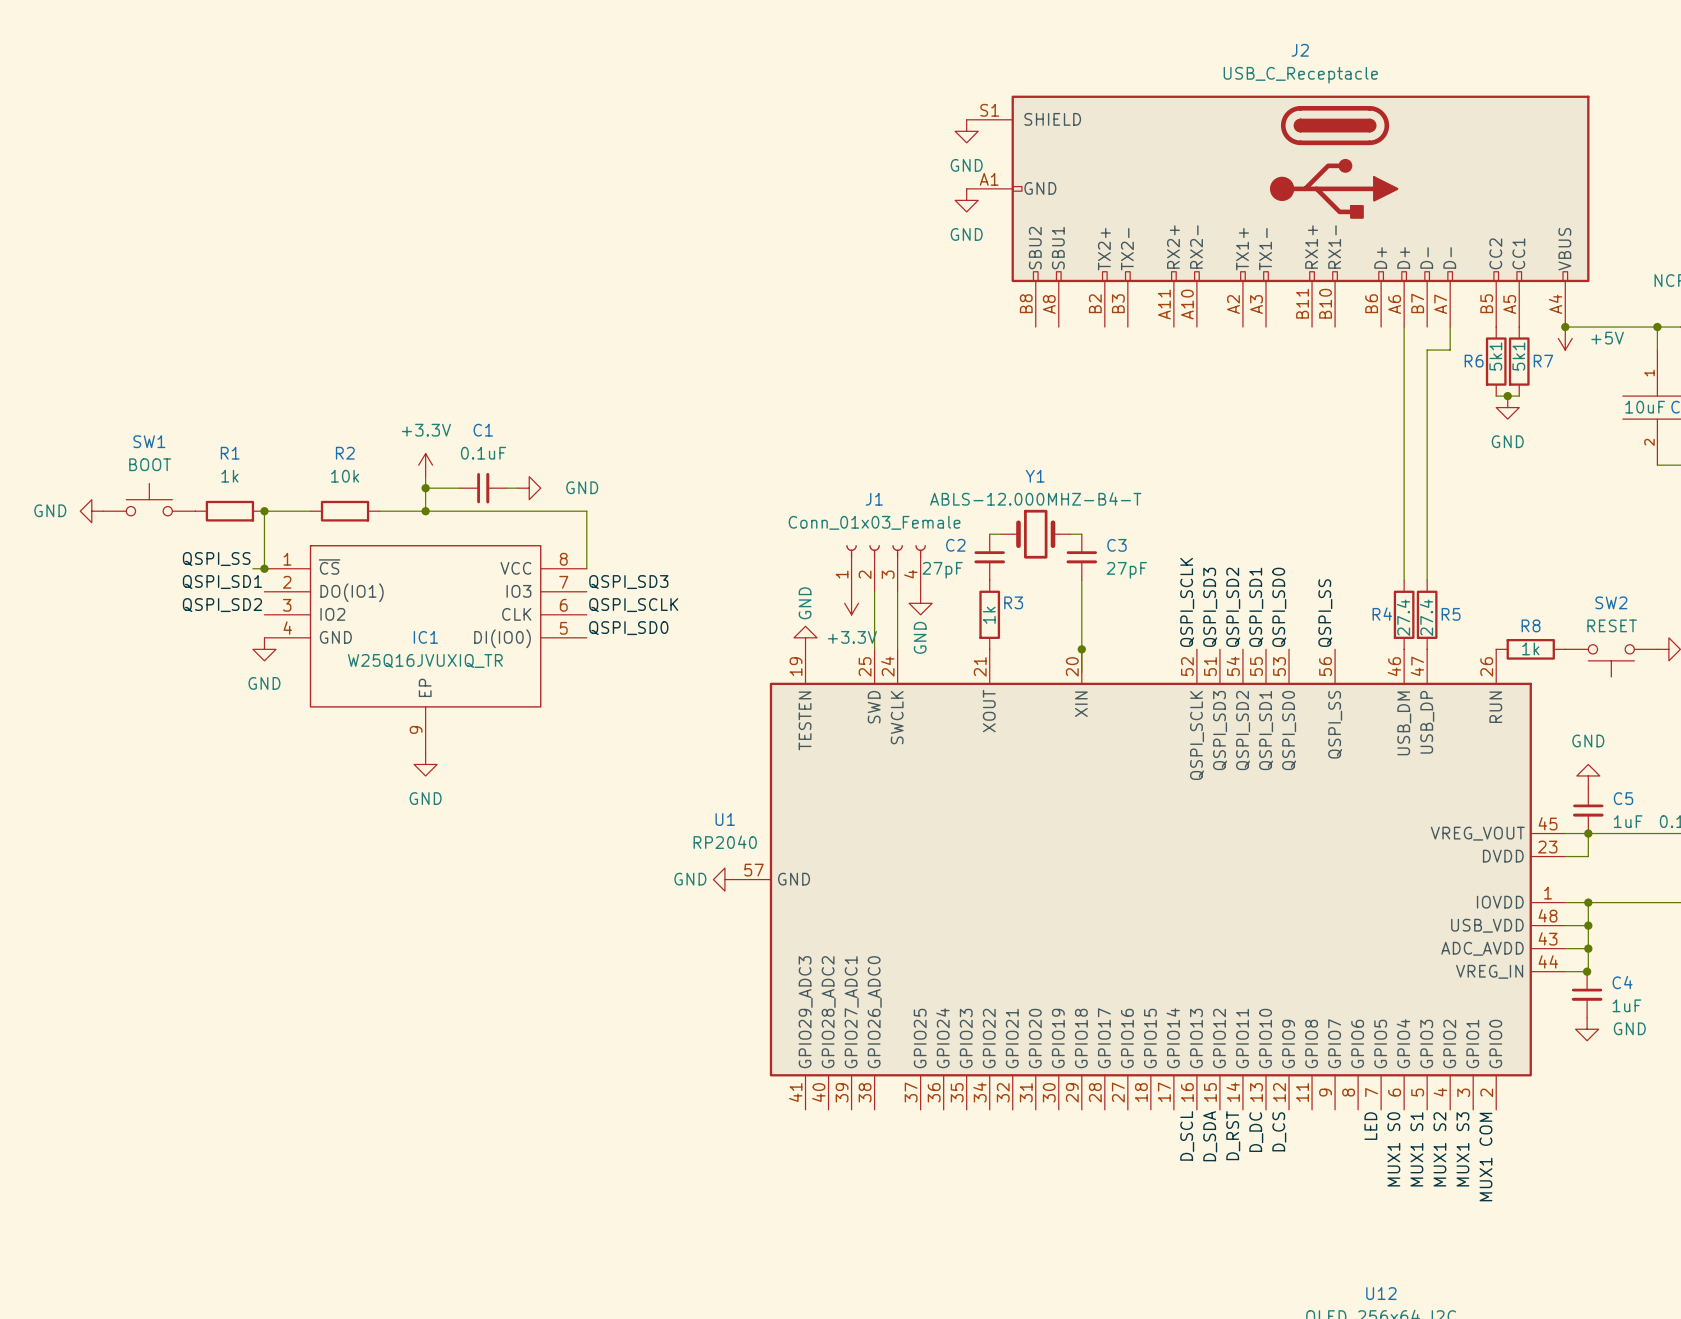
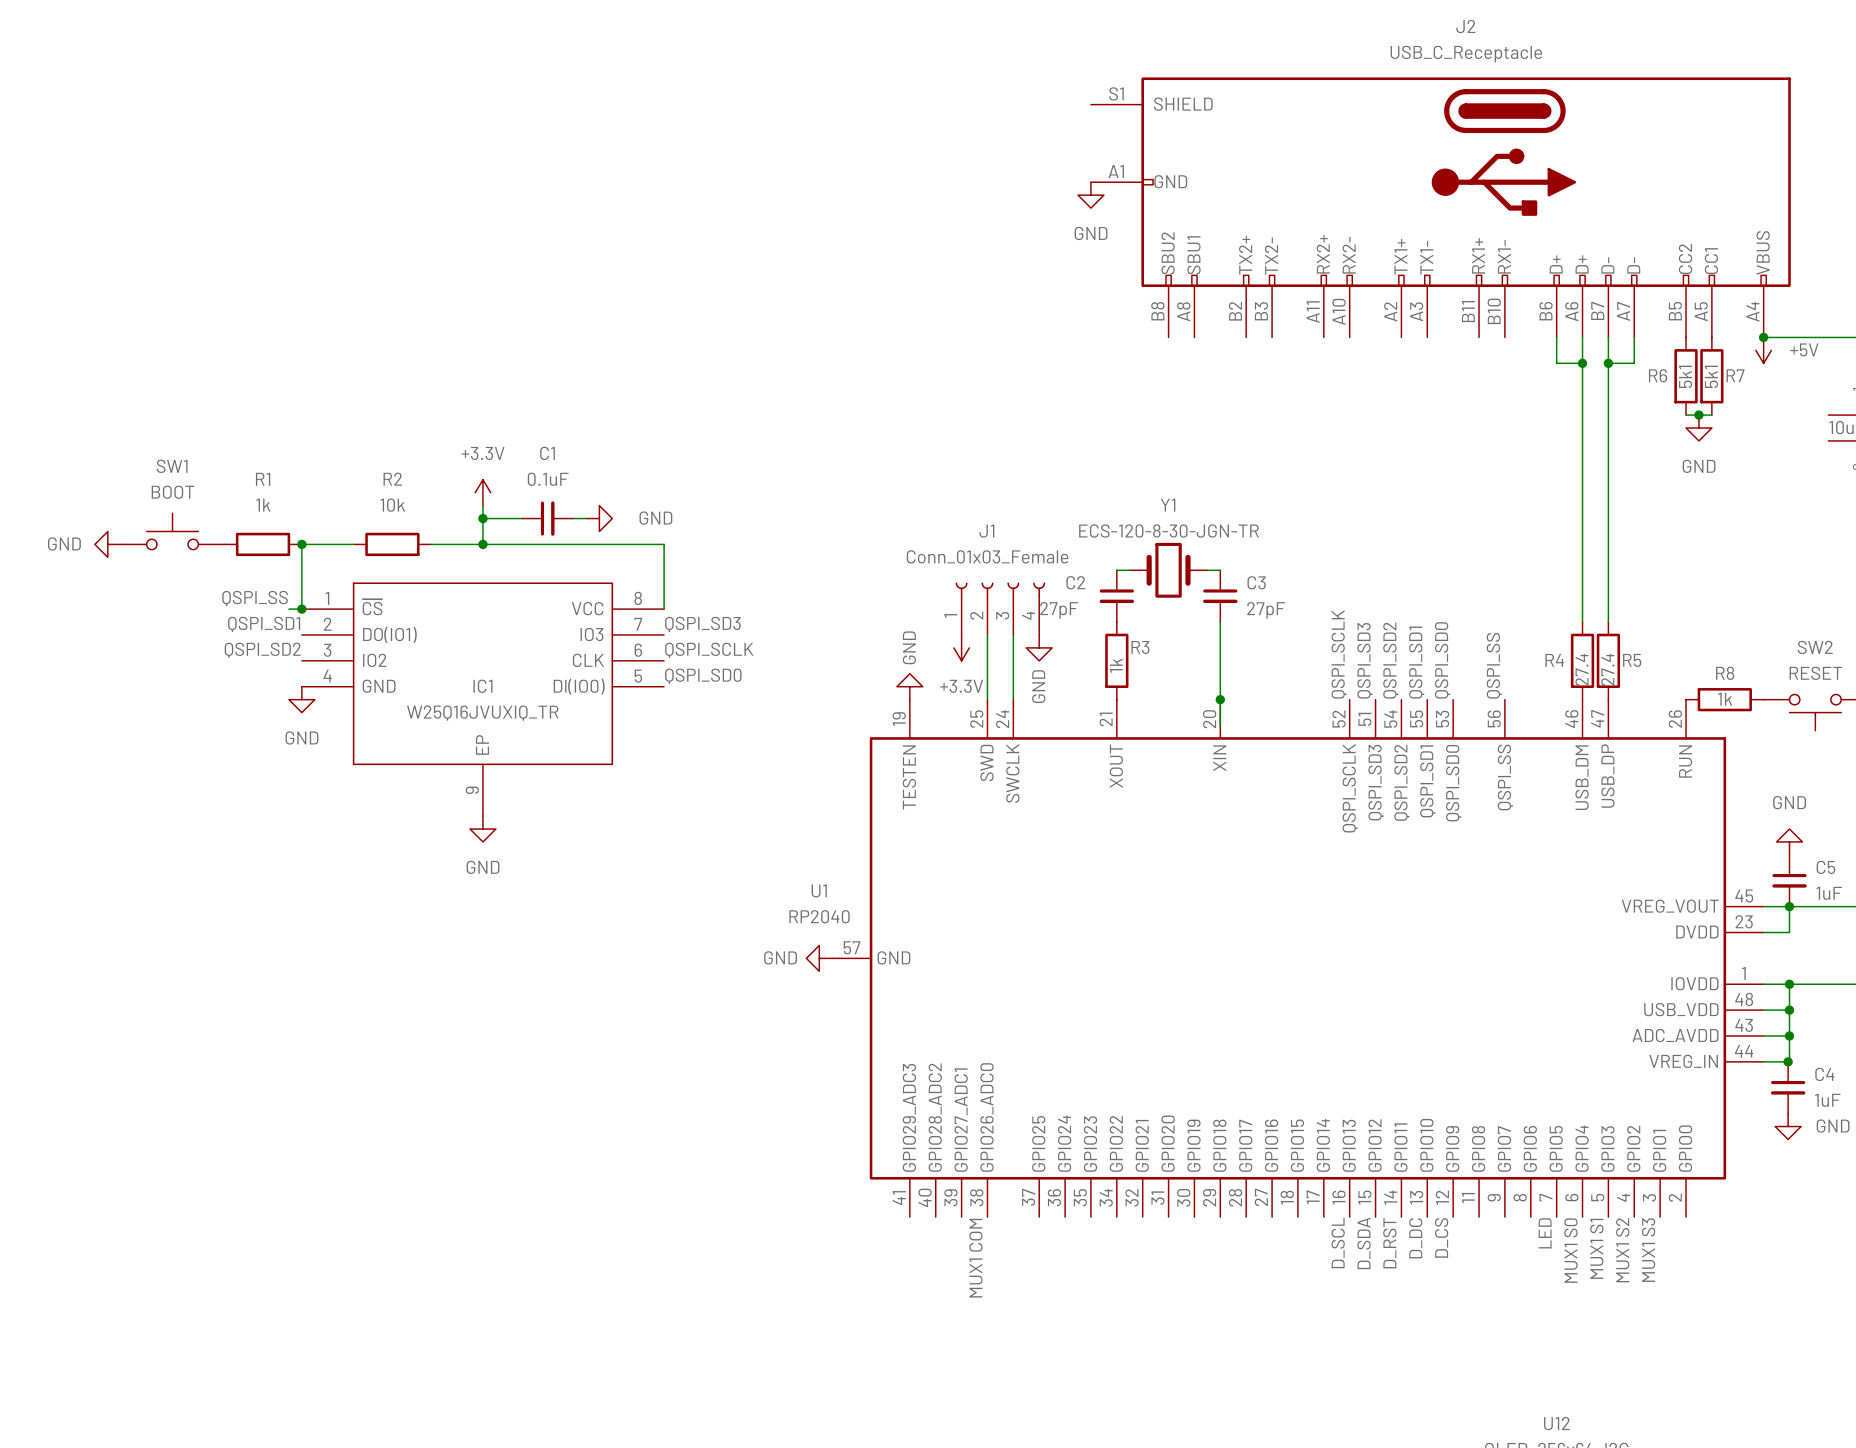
power symbol: GND (966, 131) -> none
wire: none -> (1556, 337) (1556, 363) (1582, 363)
wire: none -> (1608, 337) (1608, 363)
junction: none -> (1582, 363)
junction: none -> (1608, 363)
Y1 value: ABLS-12.000MHZ-B4-T (1035, 498) -> ECS-120-8-30-JGN-TR (1168, 531)
label: none -> MUX1 COM (975, 1258)
label: MUX1 COM (1485, 1157) -> none

